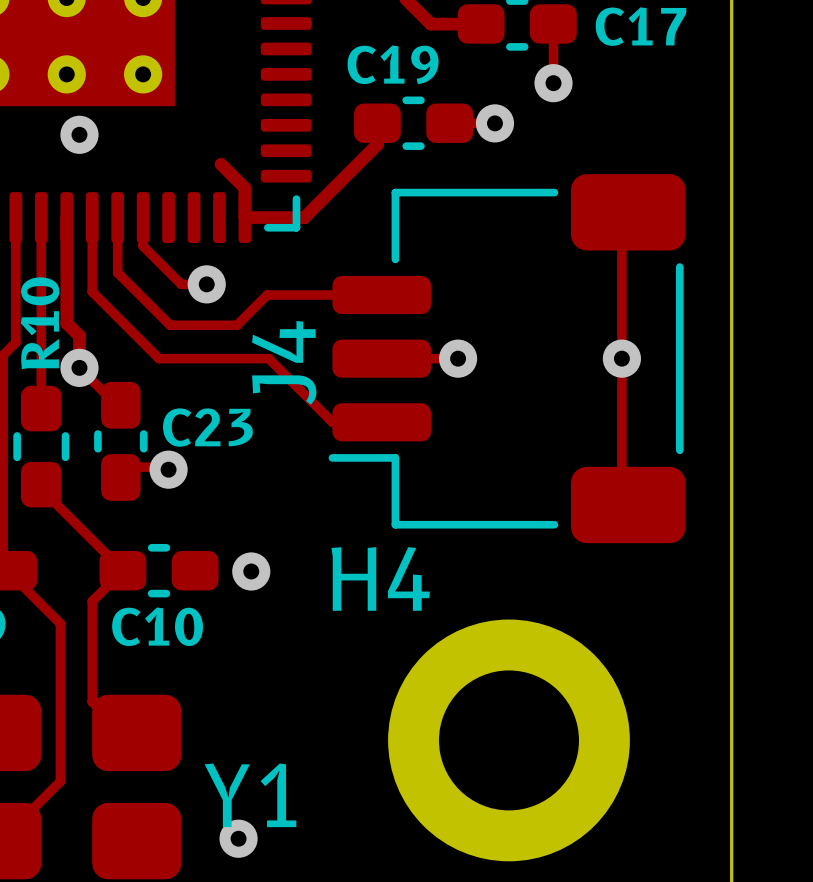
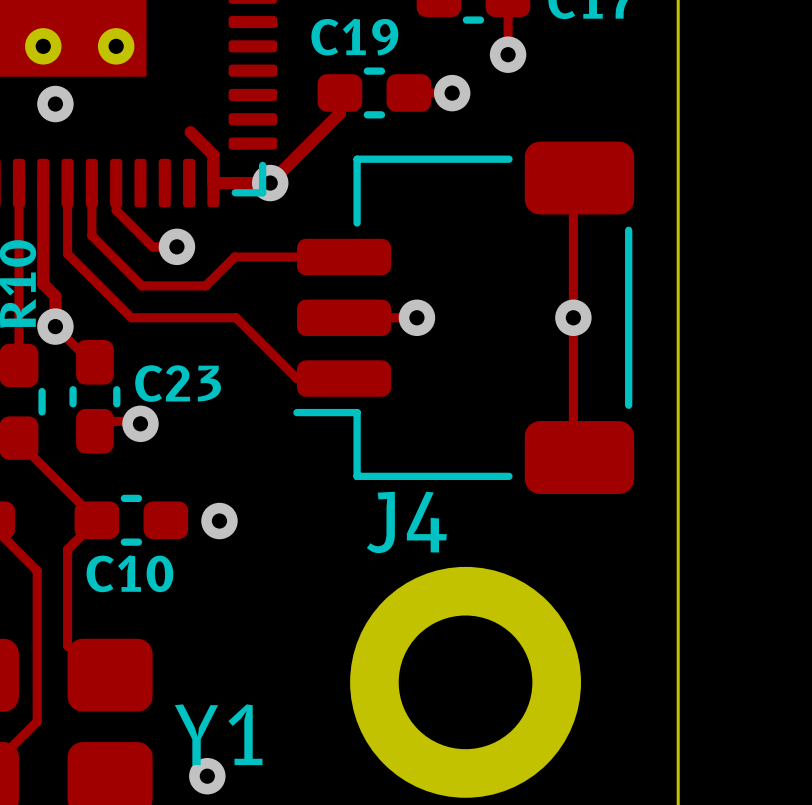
via: none -> (270, 183)
J4 name rotation: 0° (284, 362) -> 90° clockwise (406, 522)
J4 name position: J4 (284, 362) -> J4 (406, 522)
H4 name: H4 (380, 578) -> none

